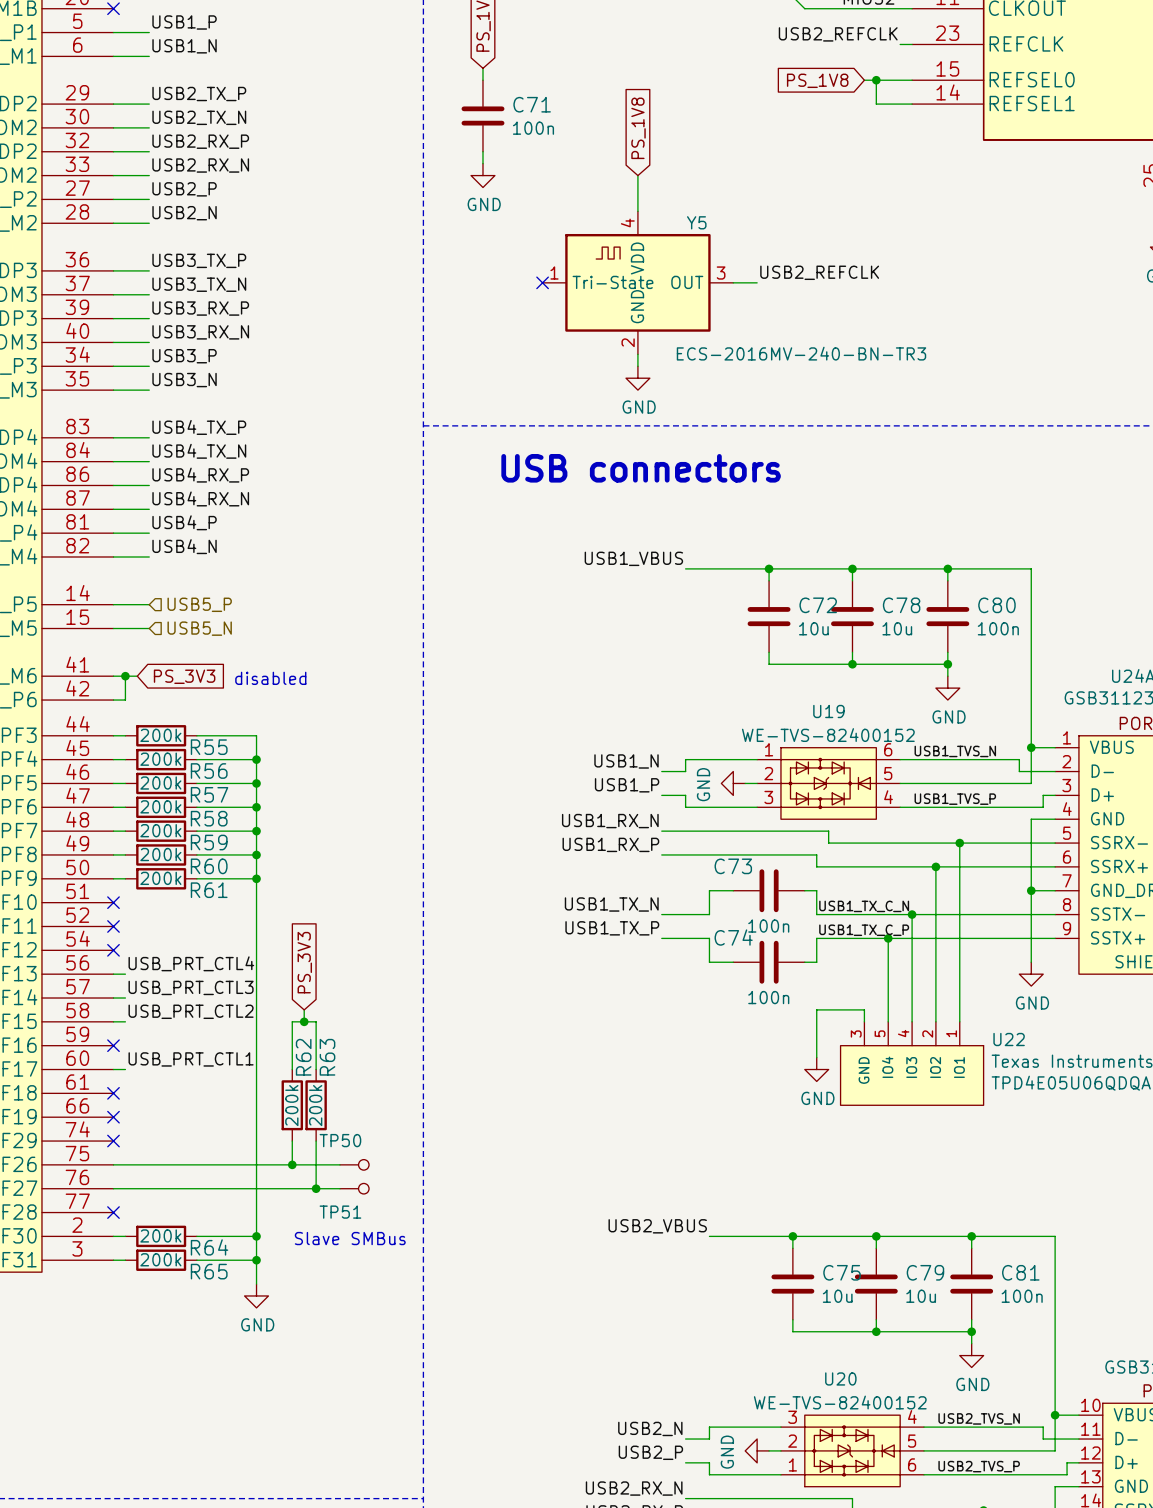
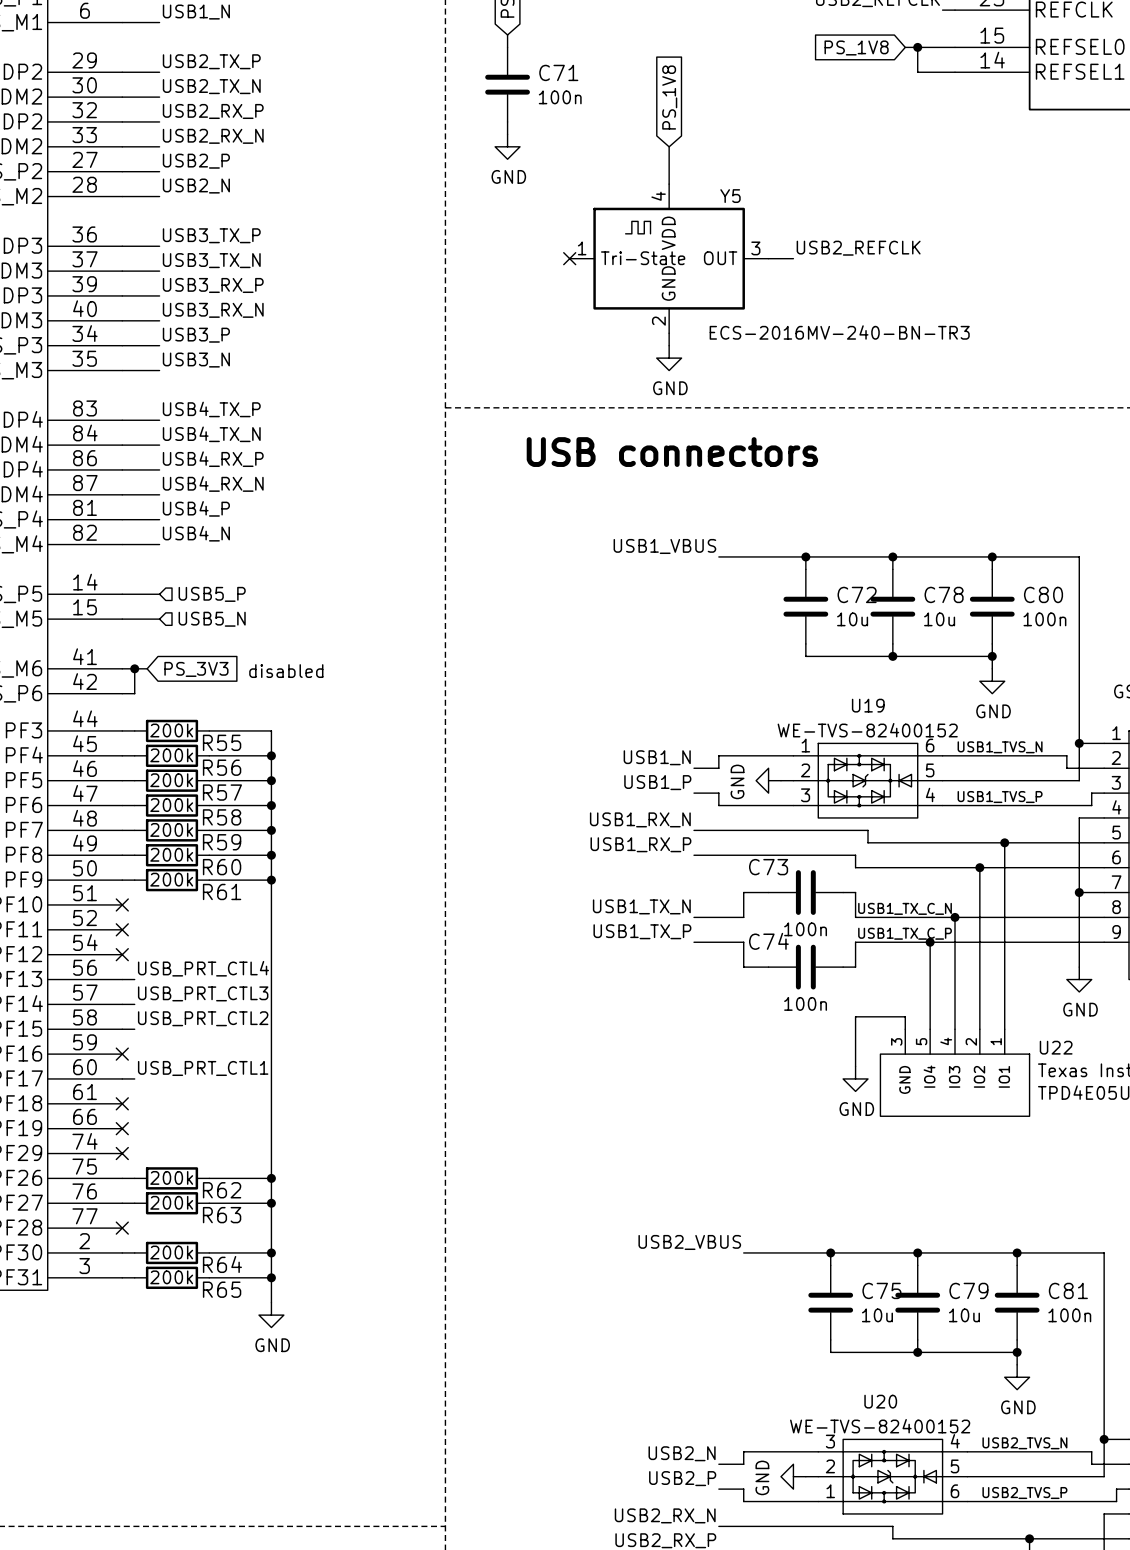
global label: PS_3V3 (304, 962) -> none
wire: (304, 1009) (304, 1021) -> none
junction: (304, 1021) -> none
wire: (292, 1069) (292, 1021) (316, 1021) (316, 1069) -> none
R62 rotation: 0° (292, 1105) -> 90° clockwise (172, 1178)
R62 position: (292, 1105) -> (172, 1178)
R63 rotation: 0° (316, 1105) -> 90° clockwise (172, 1203)
R63 position: (316, 1105) -> (172, 1203)
wire: (292, 1141) (292, 1164) -> none
wire: (316, 1141) (316, 1188) -> none
wire: (256, 1164) (339, 1164) -> none
junction: none -> (271, 1178)
junction: (292, 1164) -> none
TP50: (354, 1164) -> none
wire: (256, 1188) (339, 1188) -> none
junction: none -> (271, 1203)
junction: (316, 1188) -> none
TP51: (354, 1188) -> none
text: Slave SMBus (350, 1238) -> none

